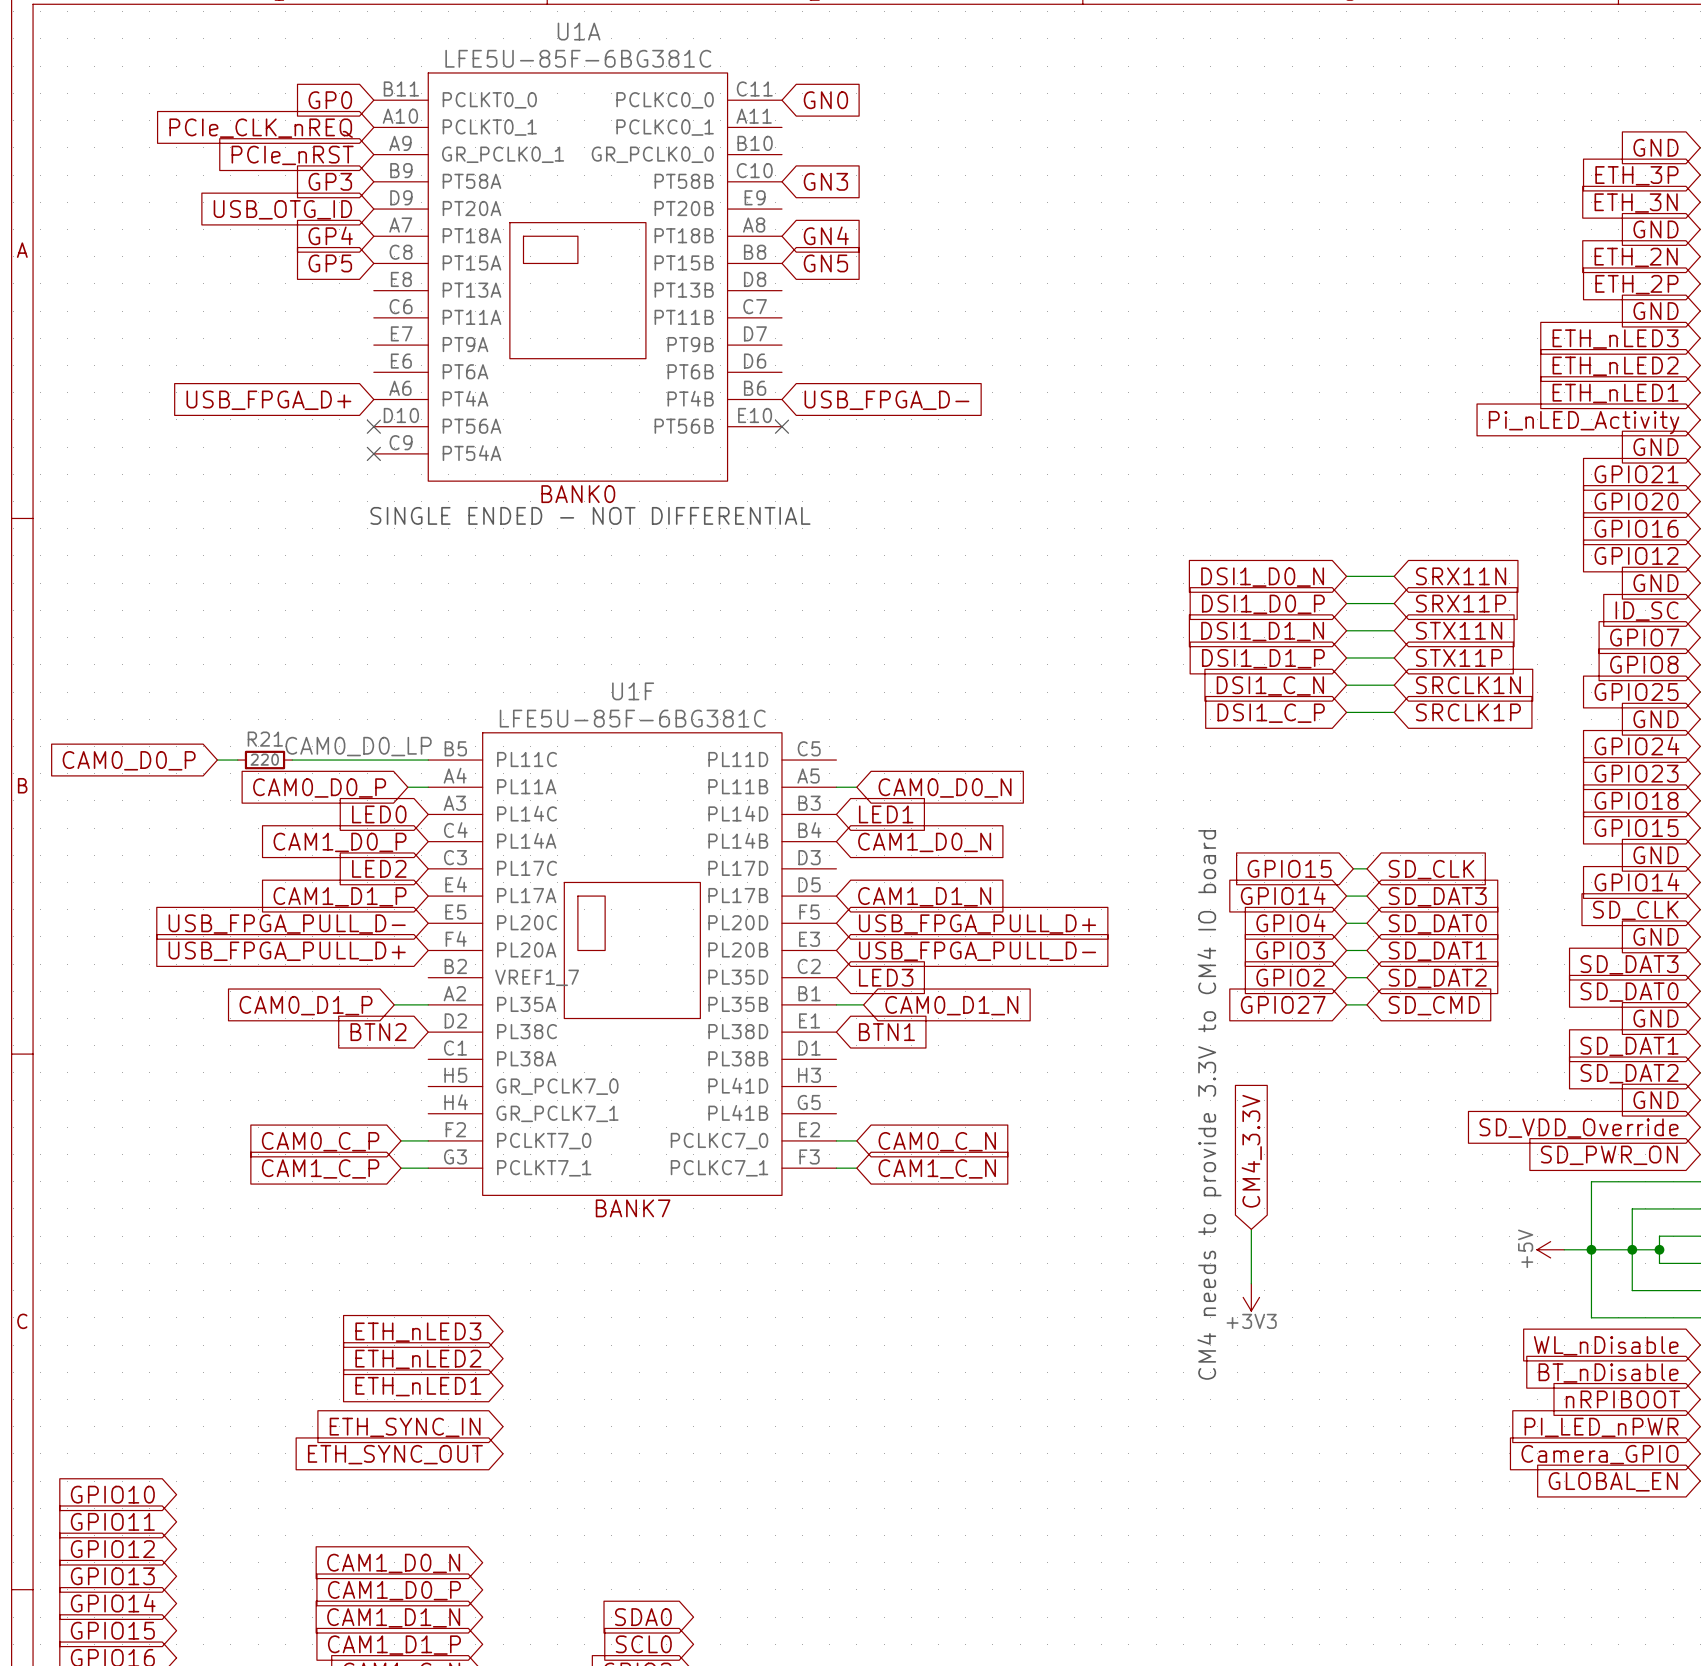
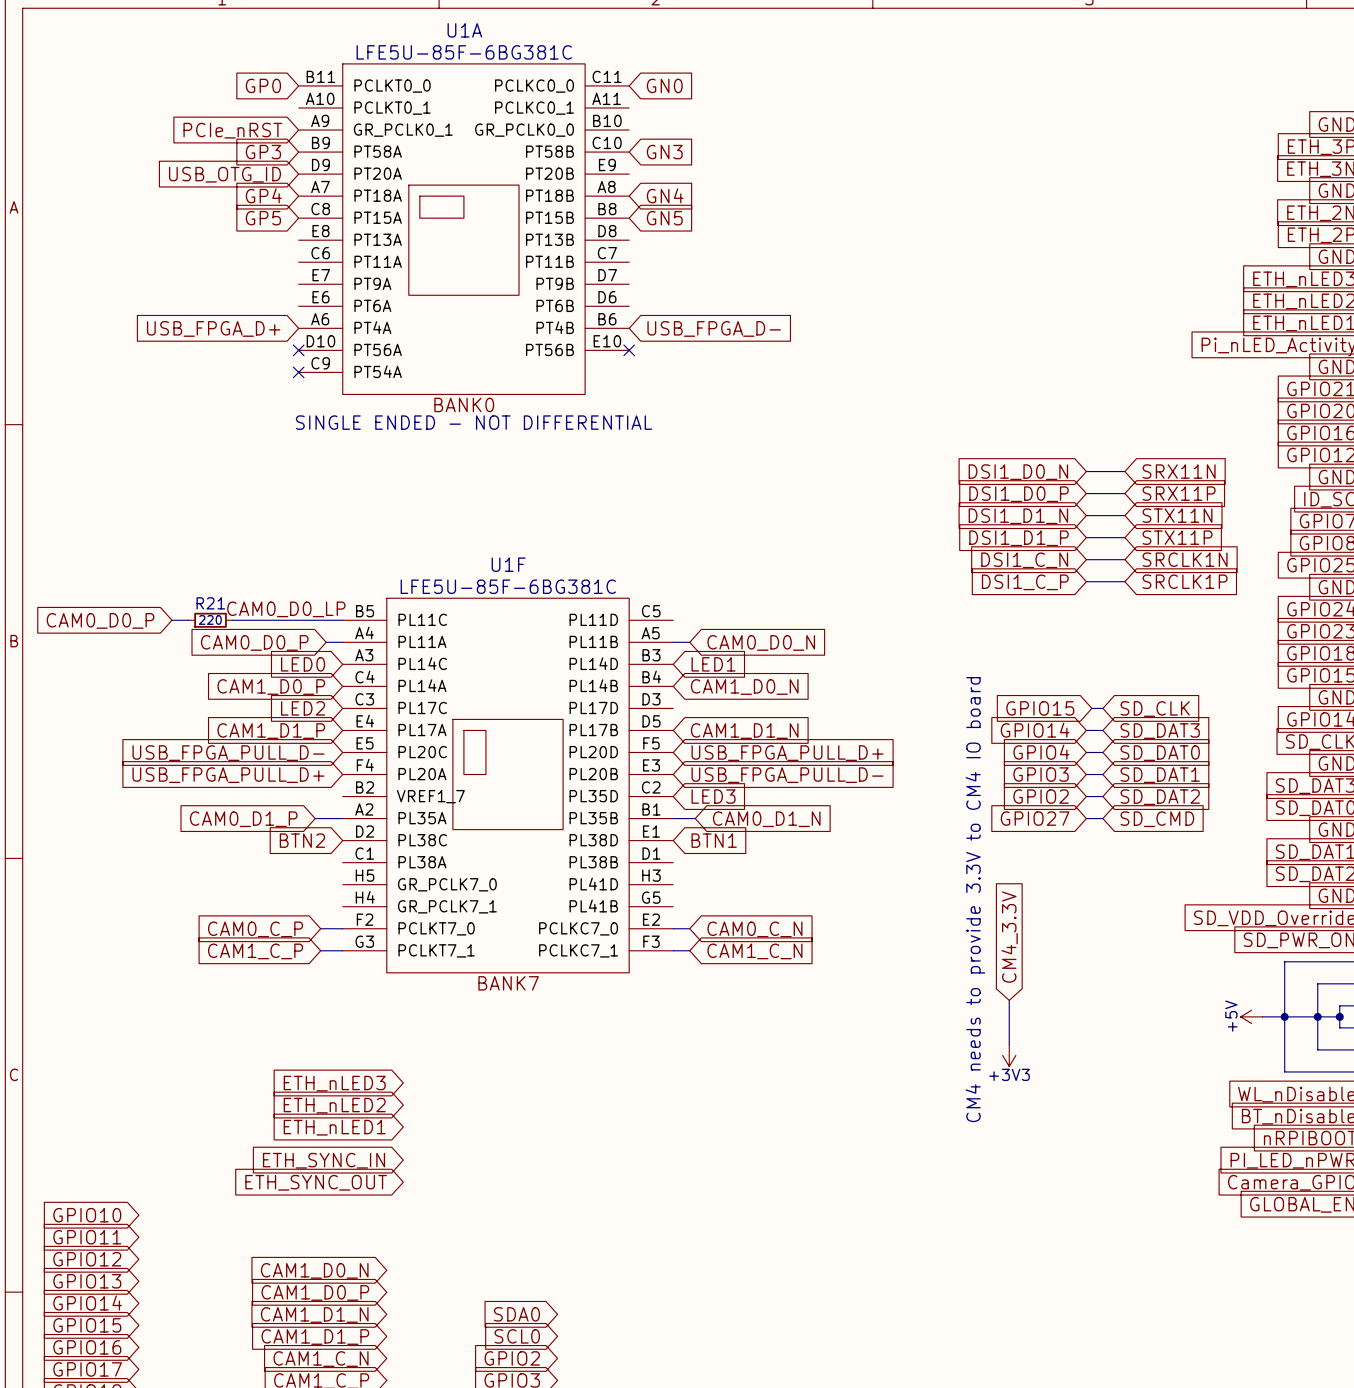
global label: PCIe_CLK_nREQ (261, 128) -> none

